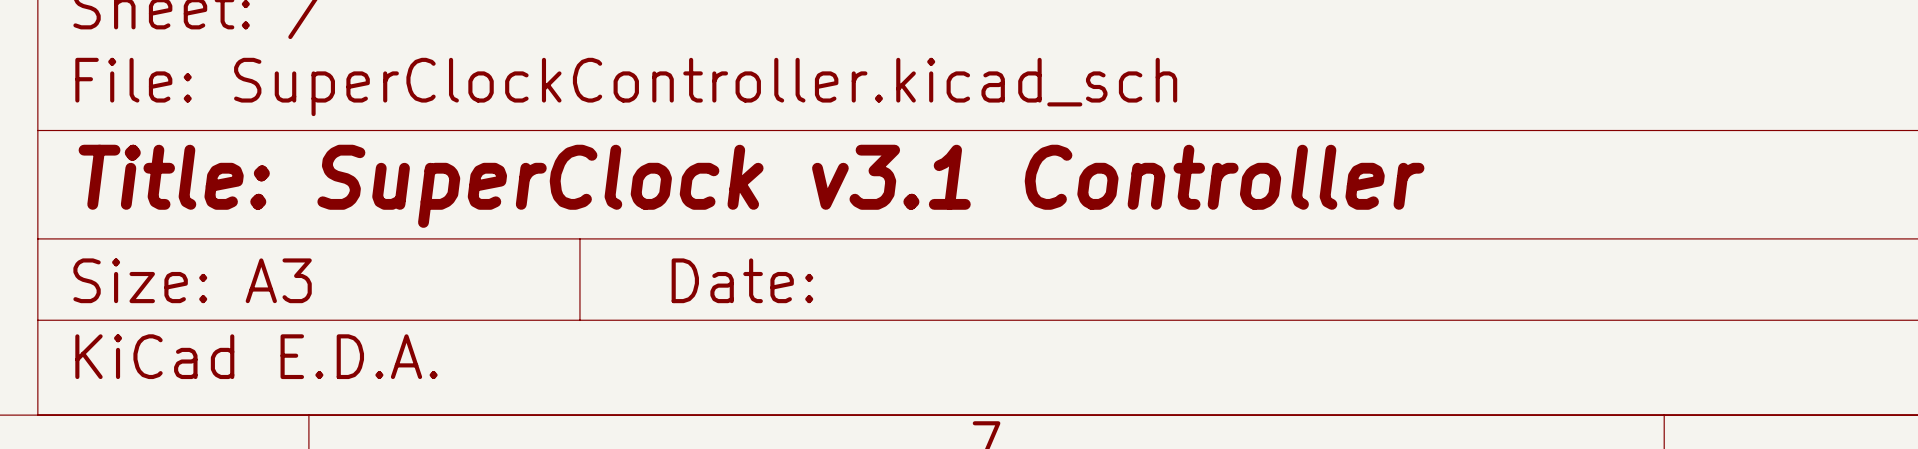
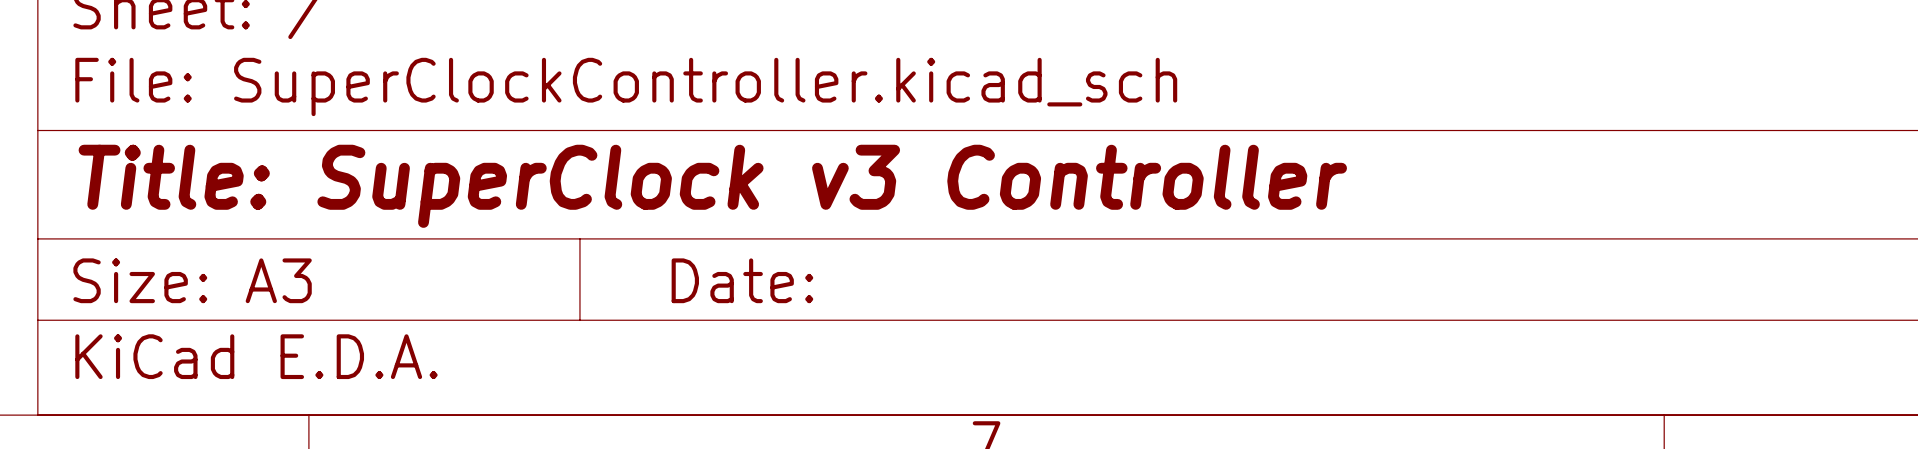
title block: Title: SuperClock v3.1 Controller (751, 186) -> Title: SuperClock v3 Controller (712, 186)

